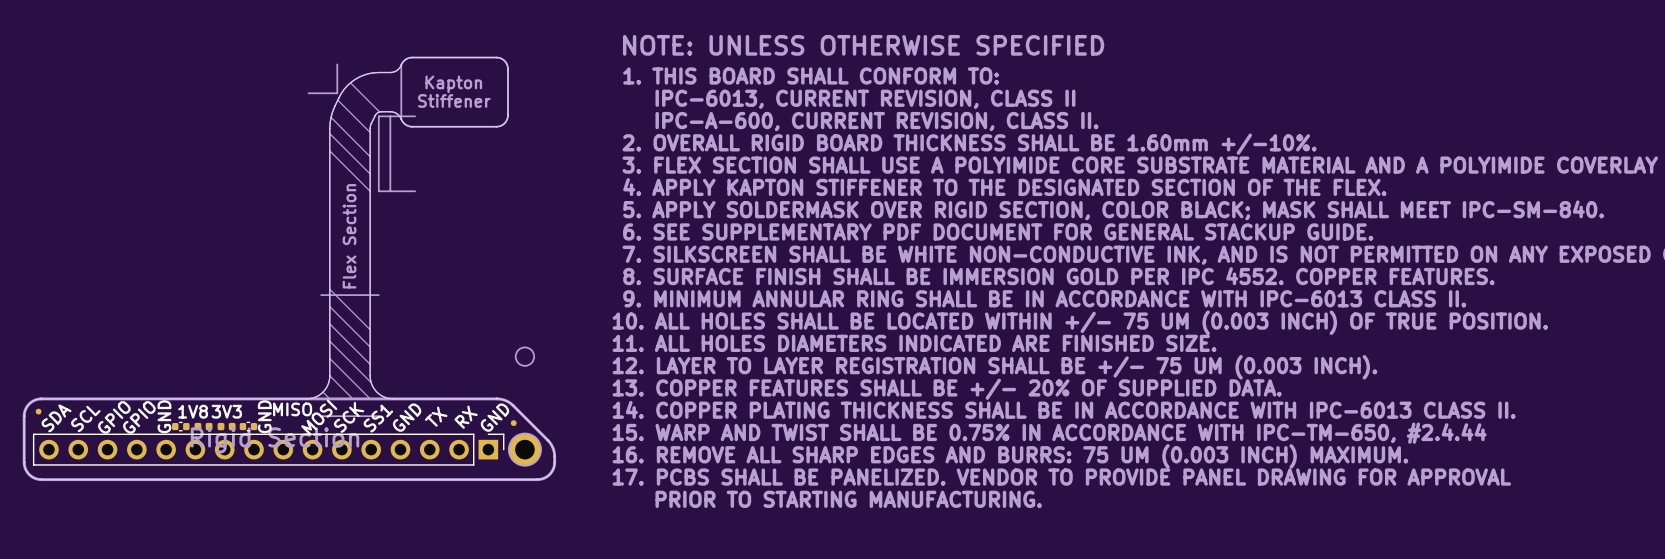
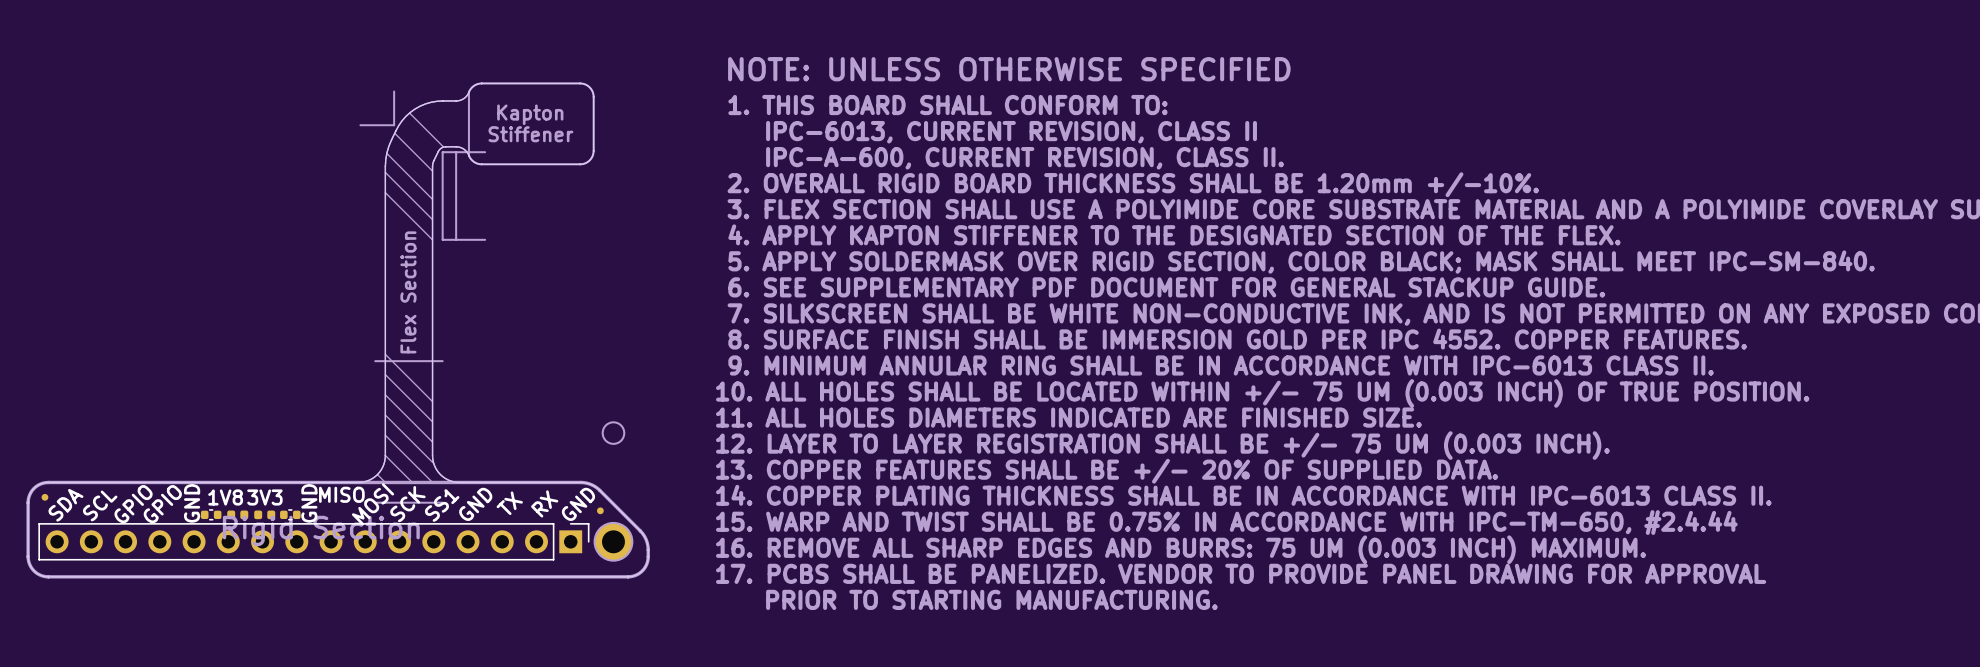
text: 2. OVERALL RIGID BOARD THICKNESS SHALL BE 1.60mm +/-10%. (969, 144) -> 2. OVERALL RIGID BOARD THICKNESS SHALL BE 1.20mm +/-10%. (1133, 184)

